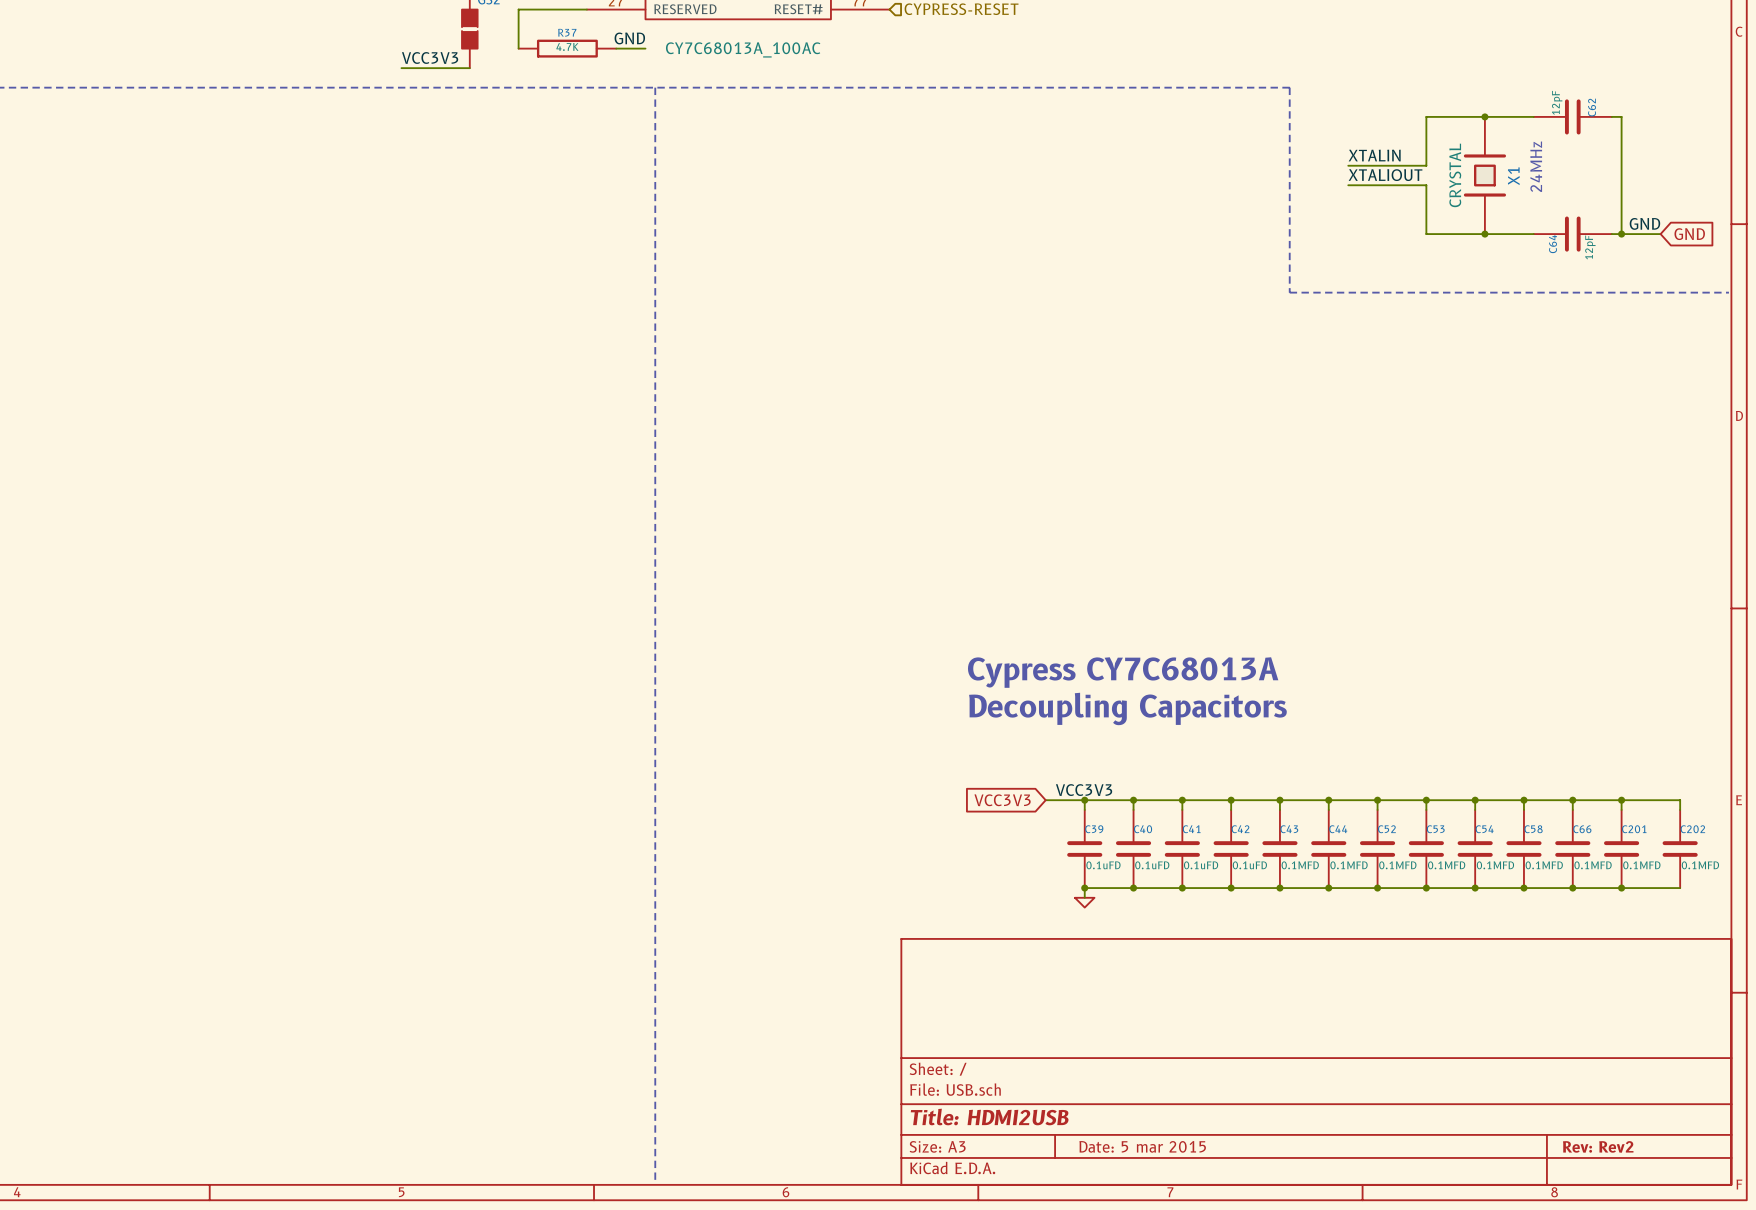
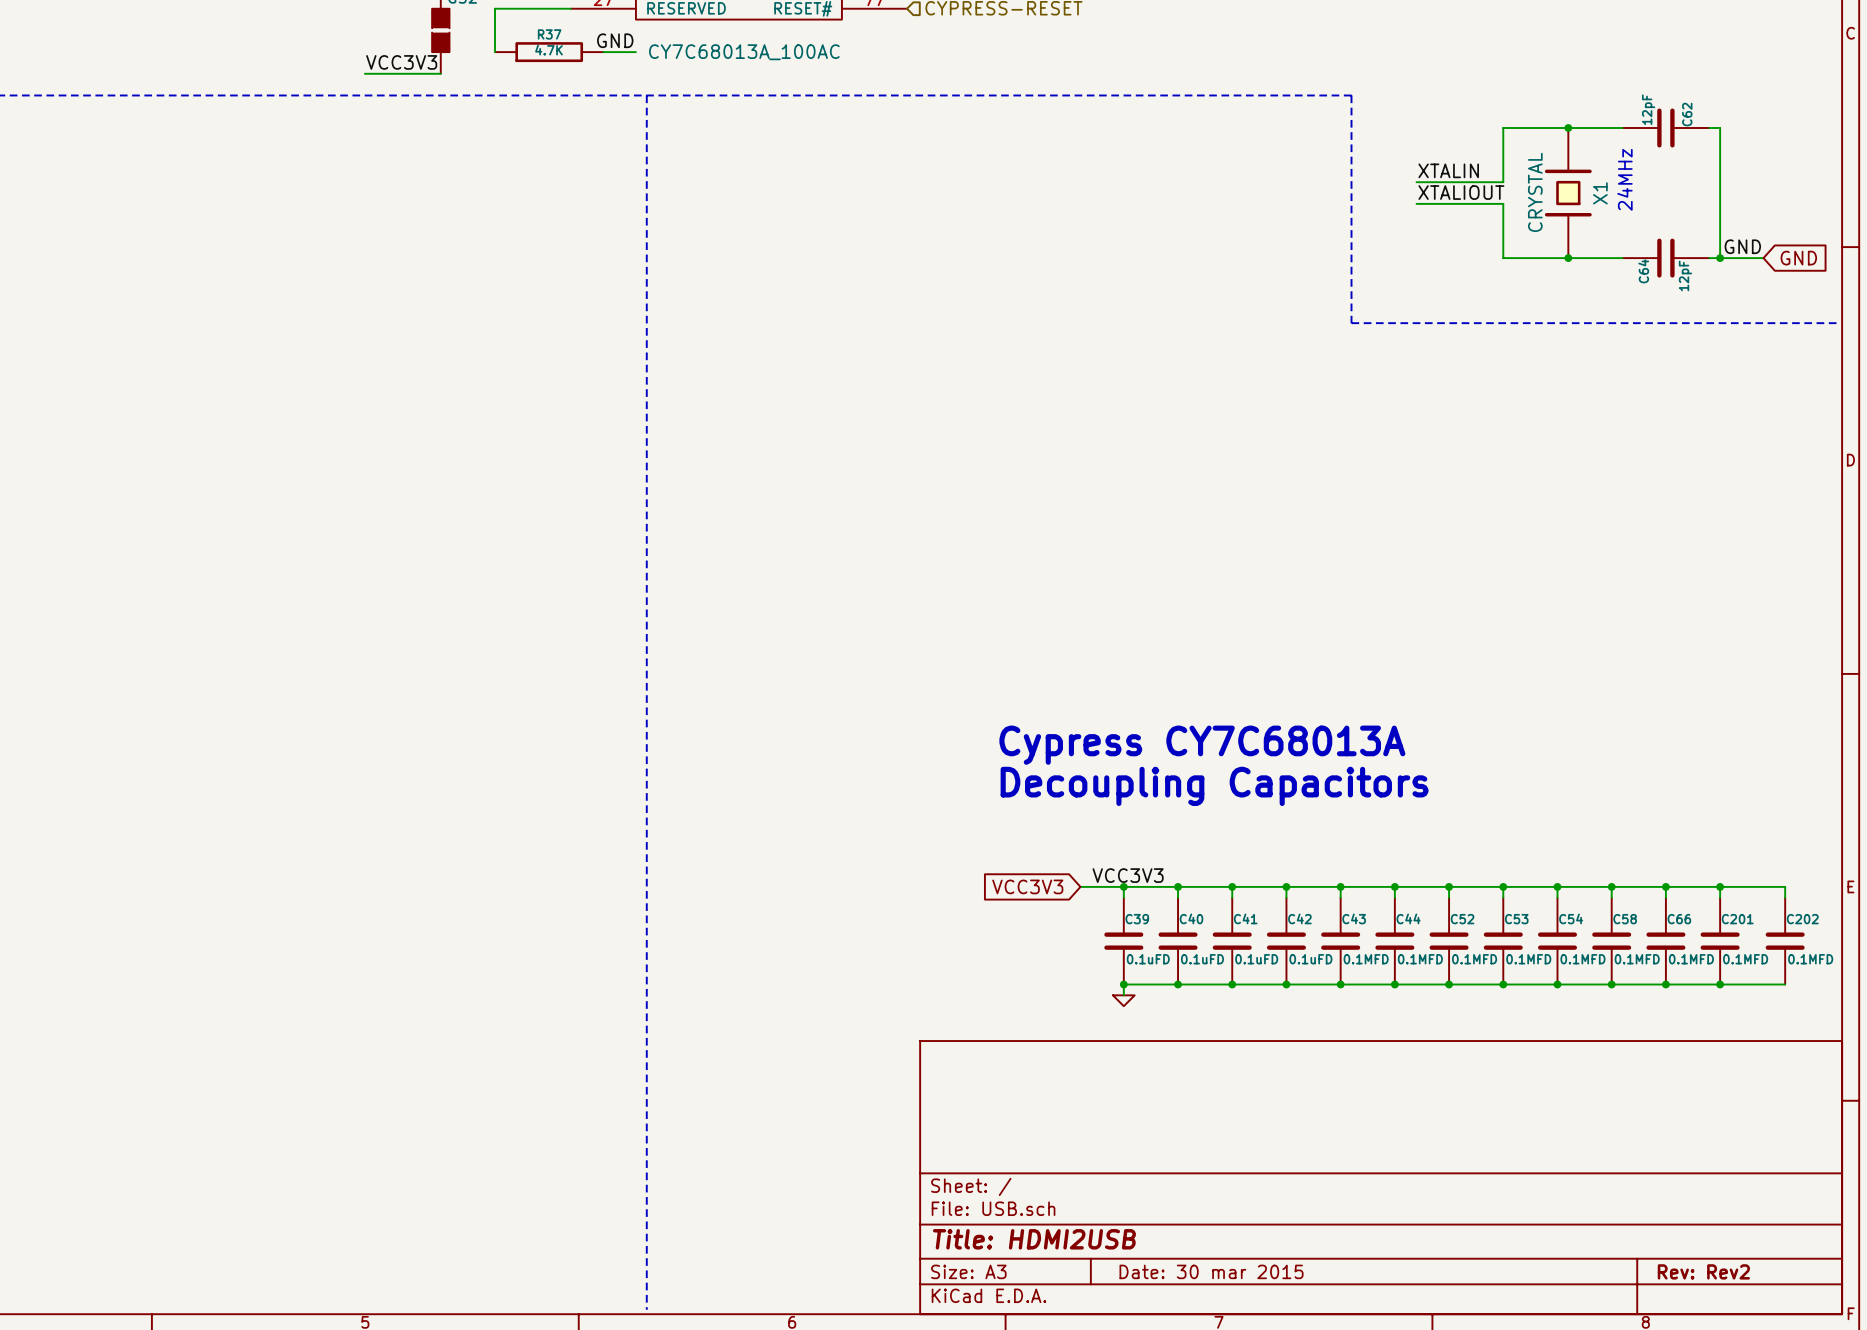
title block: Date: 5 mar 2015 (1142, 1146) -> Date: 30 mar 2015 (1211, 1271)

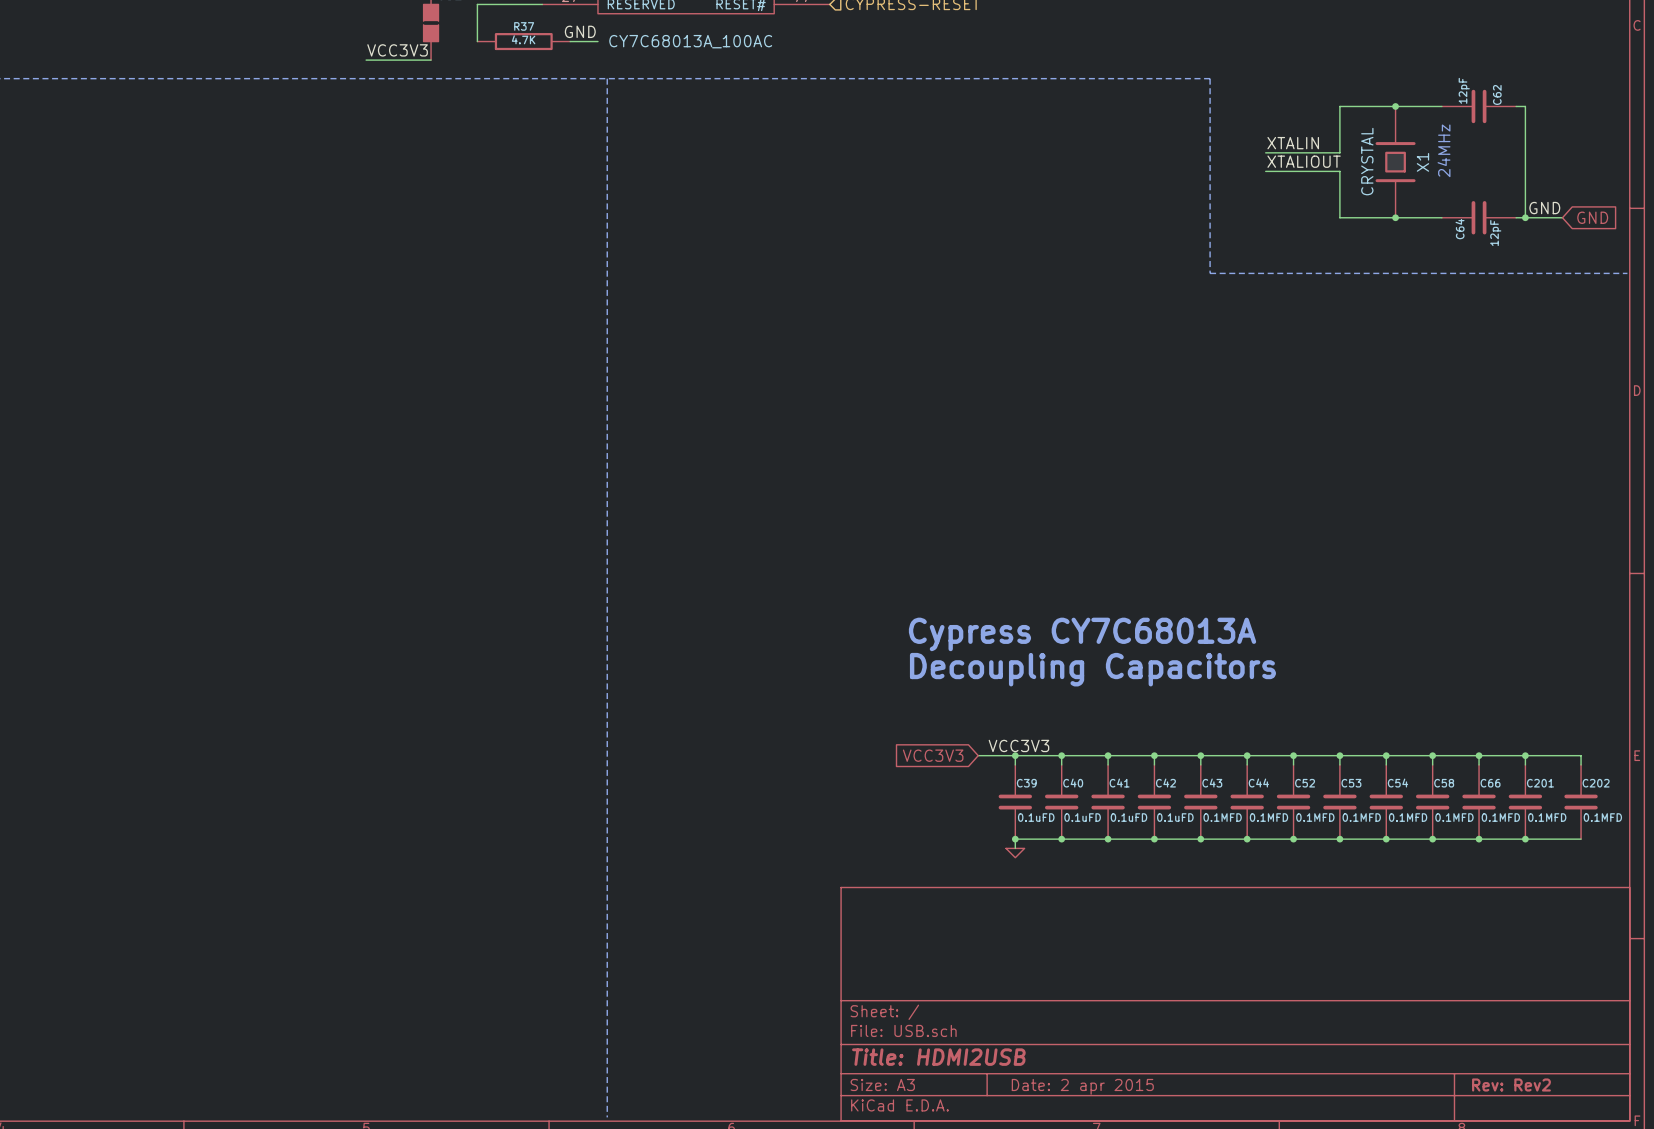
title block: Date: 30 mar 2015 (1211, 1271) -> Date: 2 apr 2015 (1082, 1086)

